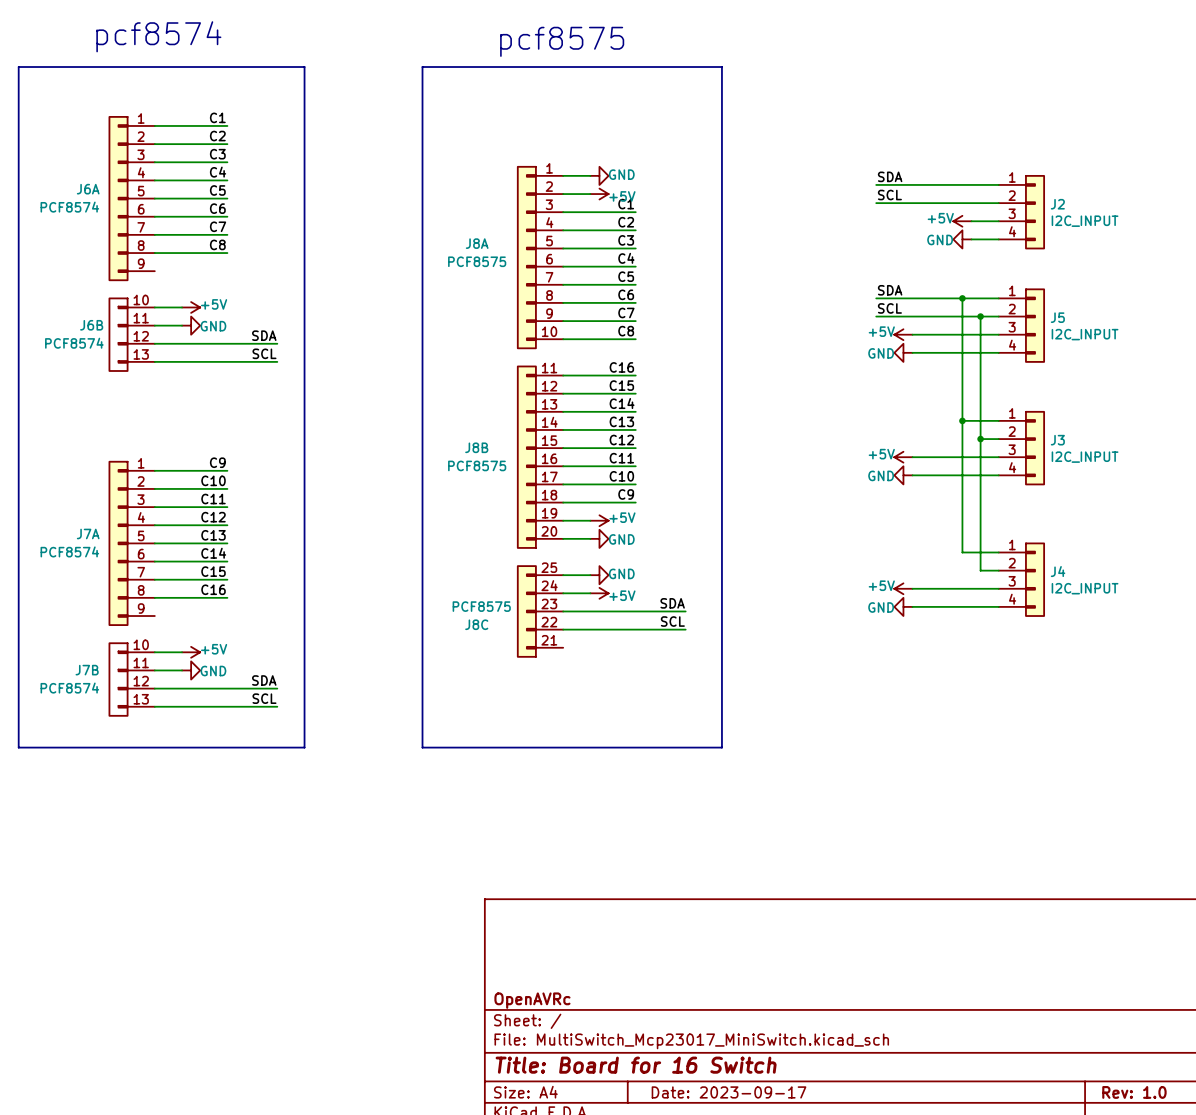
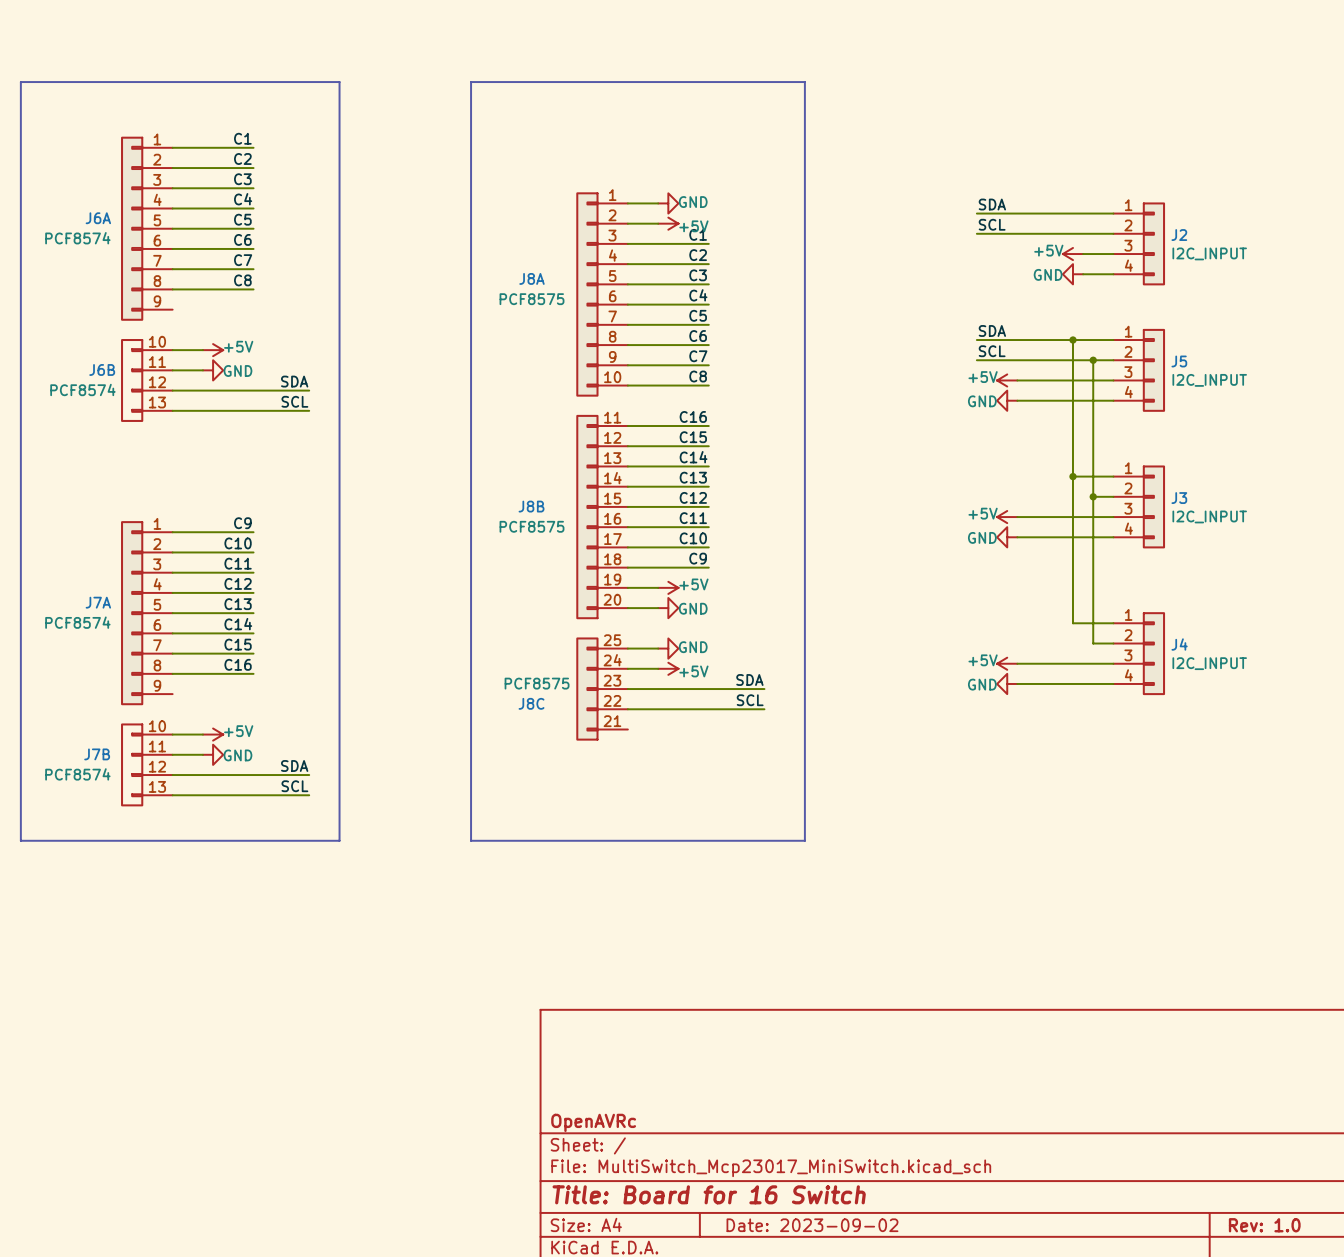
text: pcf8574 (158, 36) -> none
text: pcf8575 (562, 41) -> none
title block: Date: 2023-09-17 (729, 1092) -> Date: 2023-09-02 (812, 1225)

